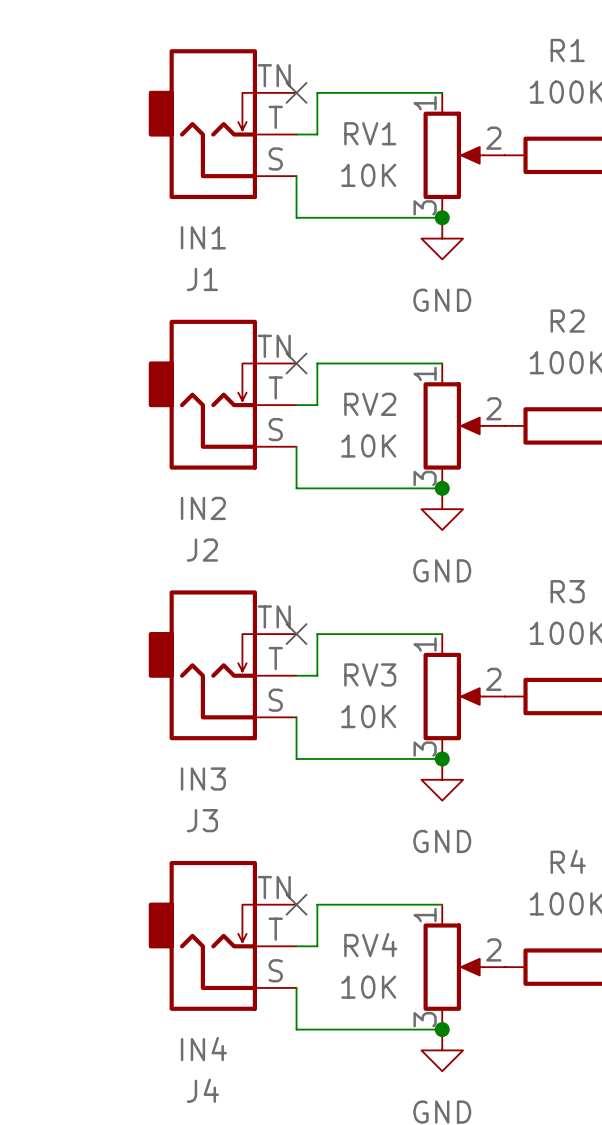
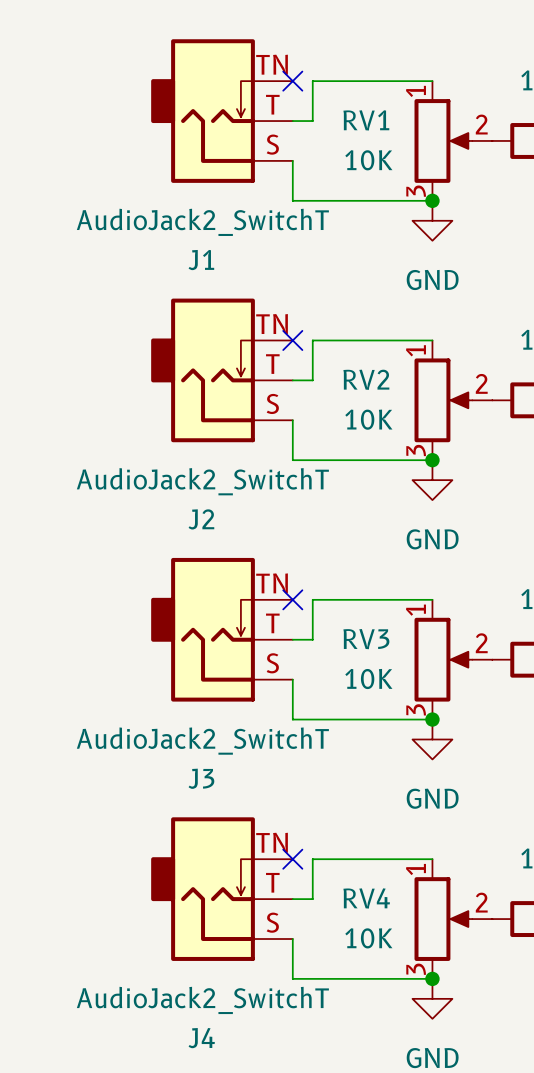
J1 value: IN1 (203, 237) -> AudioJack2_SwitchT (202, 222)
J2 value: IN2 (203, 508) -> AudioJack2_SwitchT (202, 481)
J3 value: IN3 (203, 779) -> AudioJack2_SwitchT (202, 741)
J4 value: IN4 (203, 1049) -> AudioJack2_SwitchT (202, 1000)

